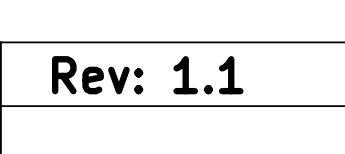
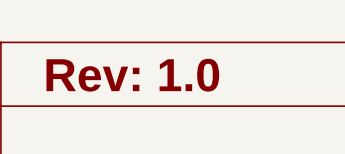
title block: Rev: 1.1 (147, 75) -> Rev: 1.0 (132, 75)

